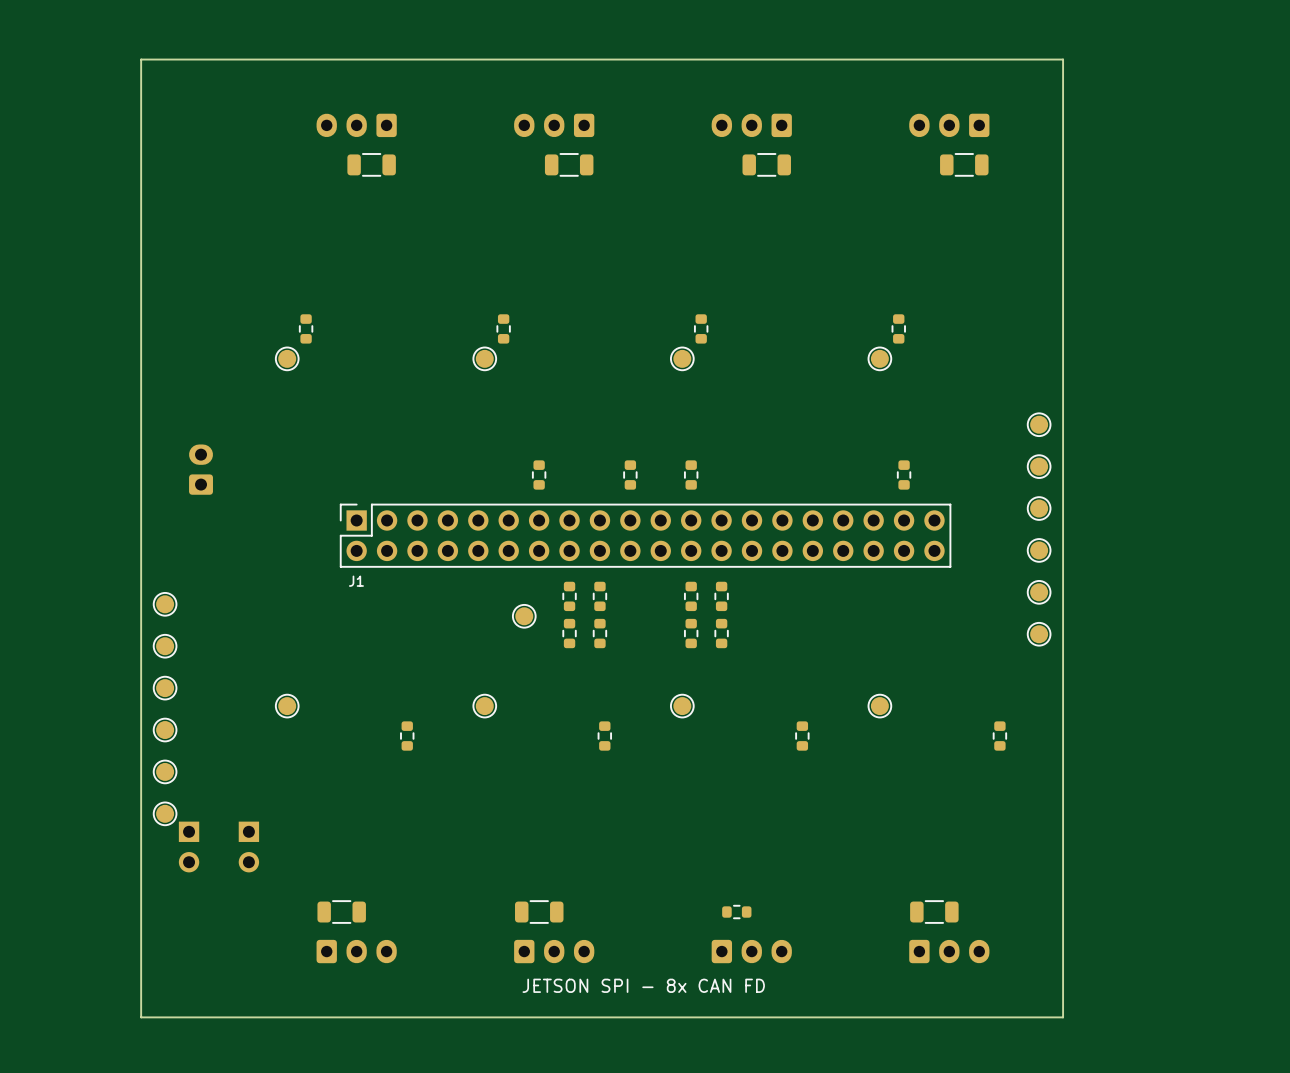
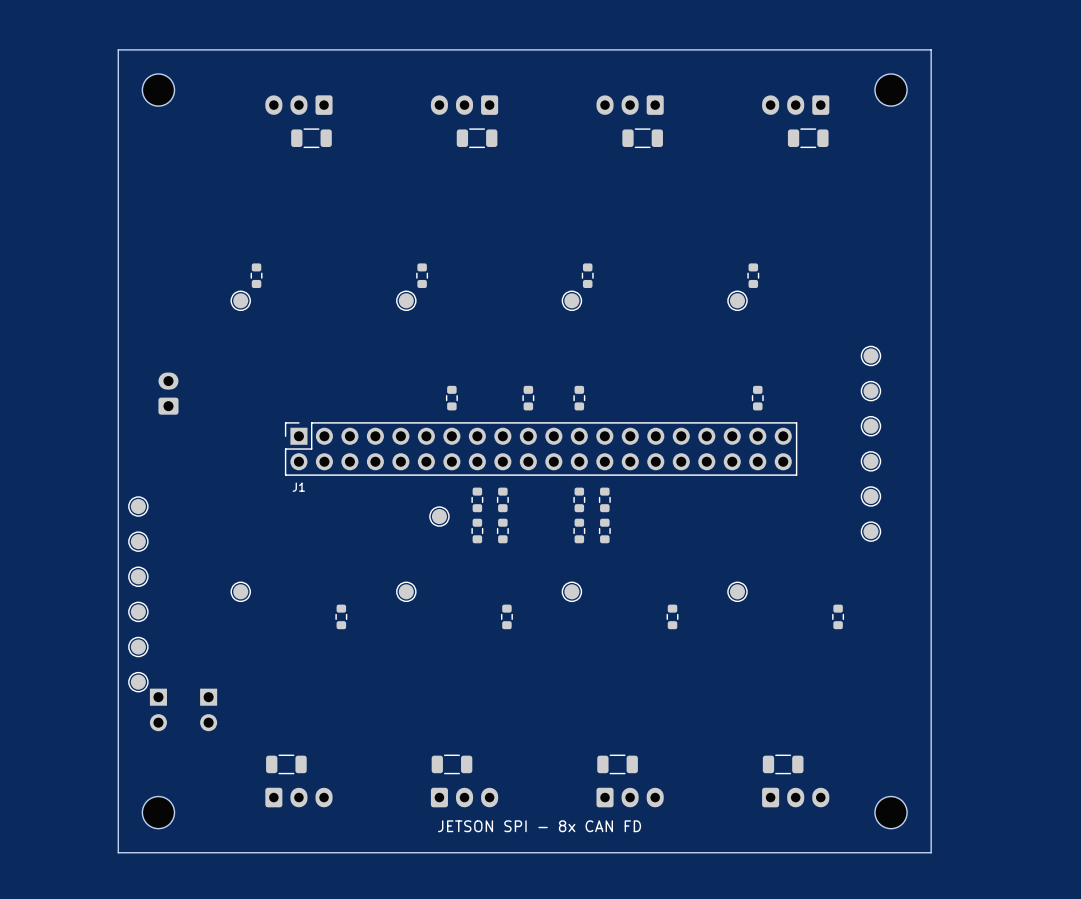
board edge: (1063, 59) (1063, 1017) -> (891, 49) (931, 49) (931, 852) (891, 852)
part: none -> (158, 90)
part: none -> (891, 90)
part footprint: [722, 905, 752, 919] -> [597, 754, 638, 775]
part: none -> (158, 812)
part: none -> (891, 812)

